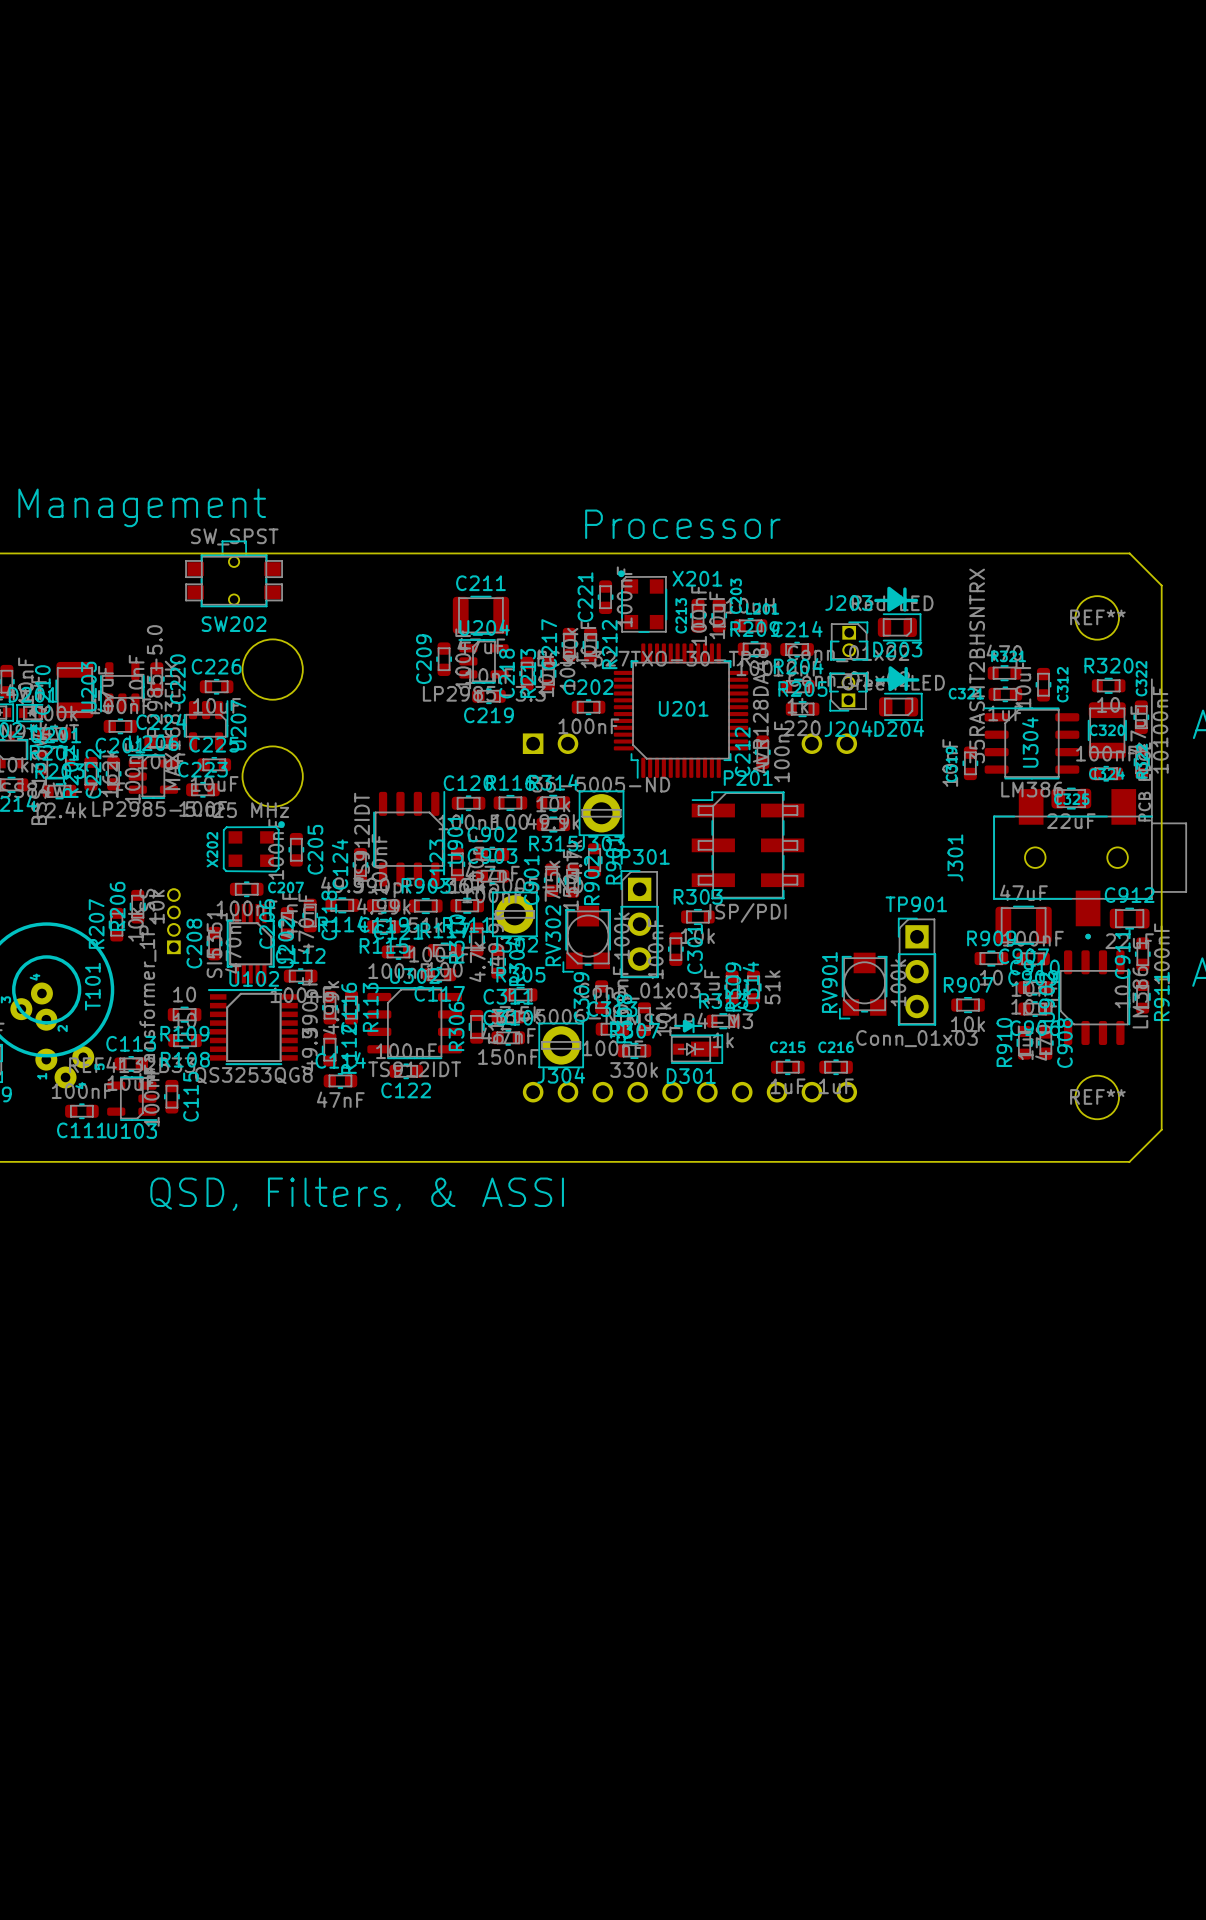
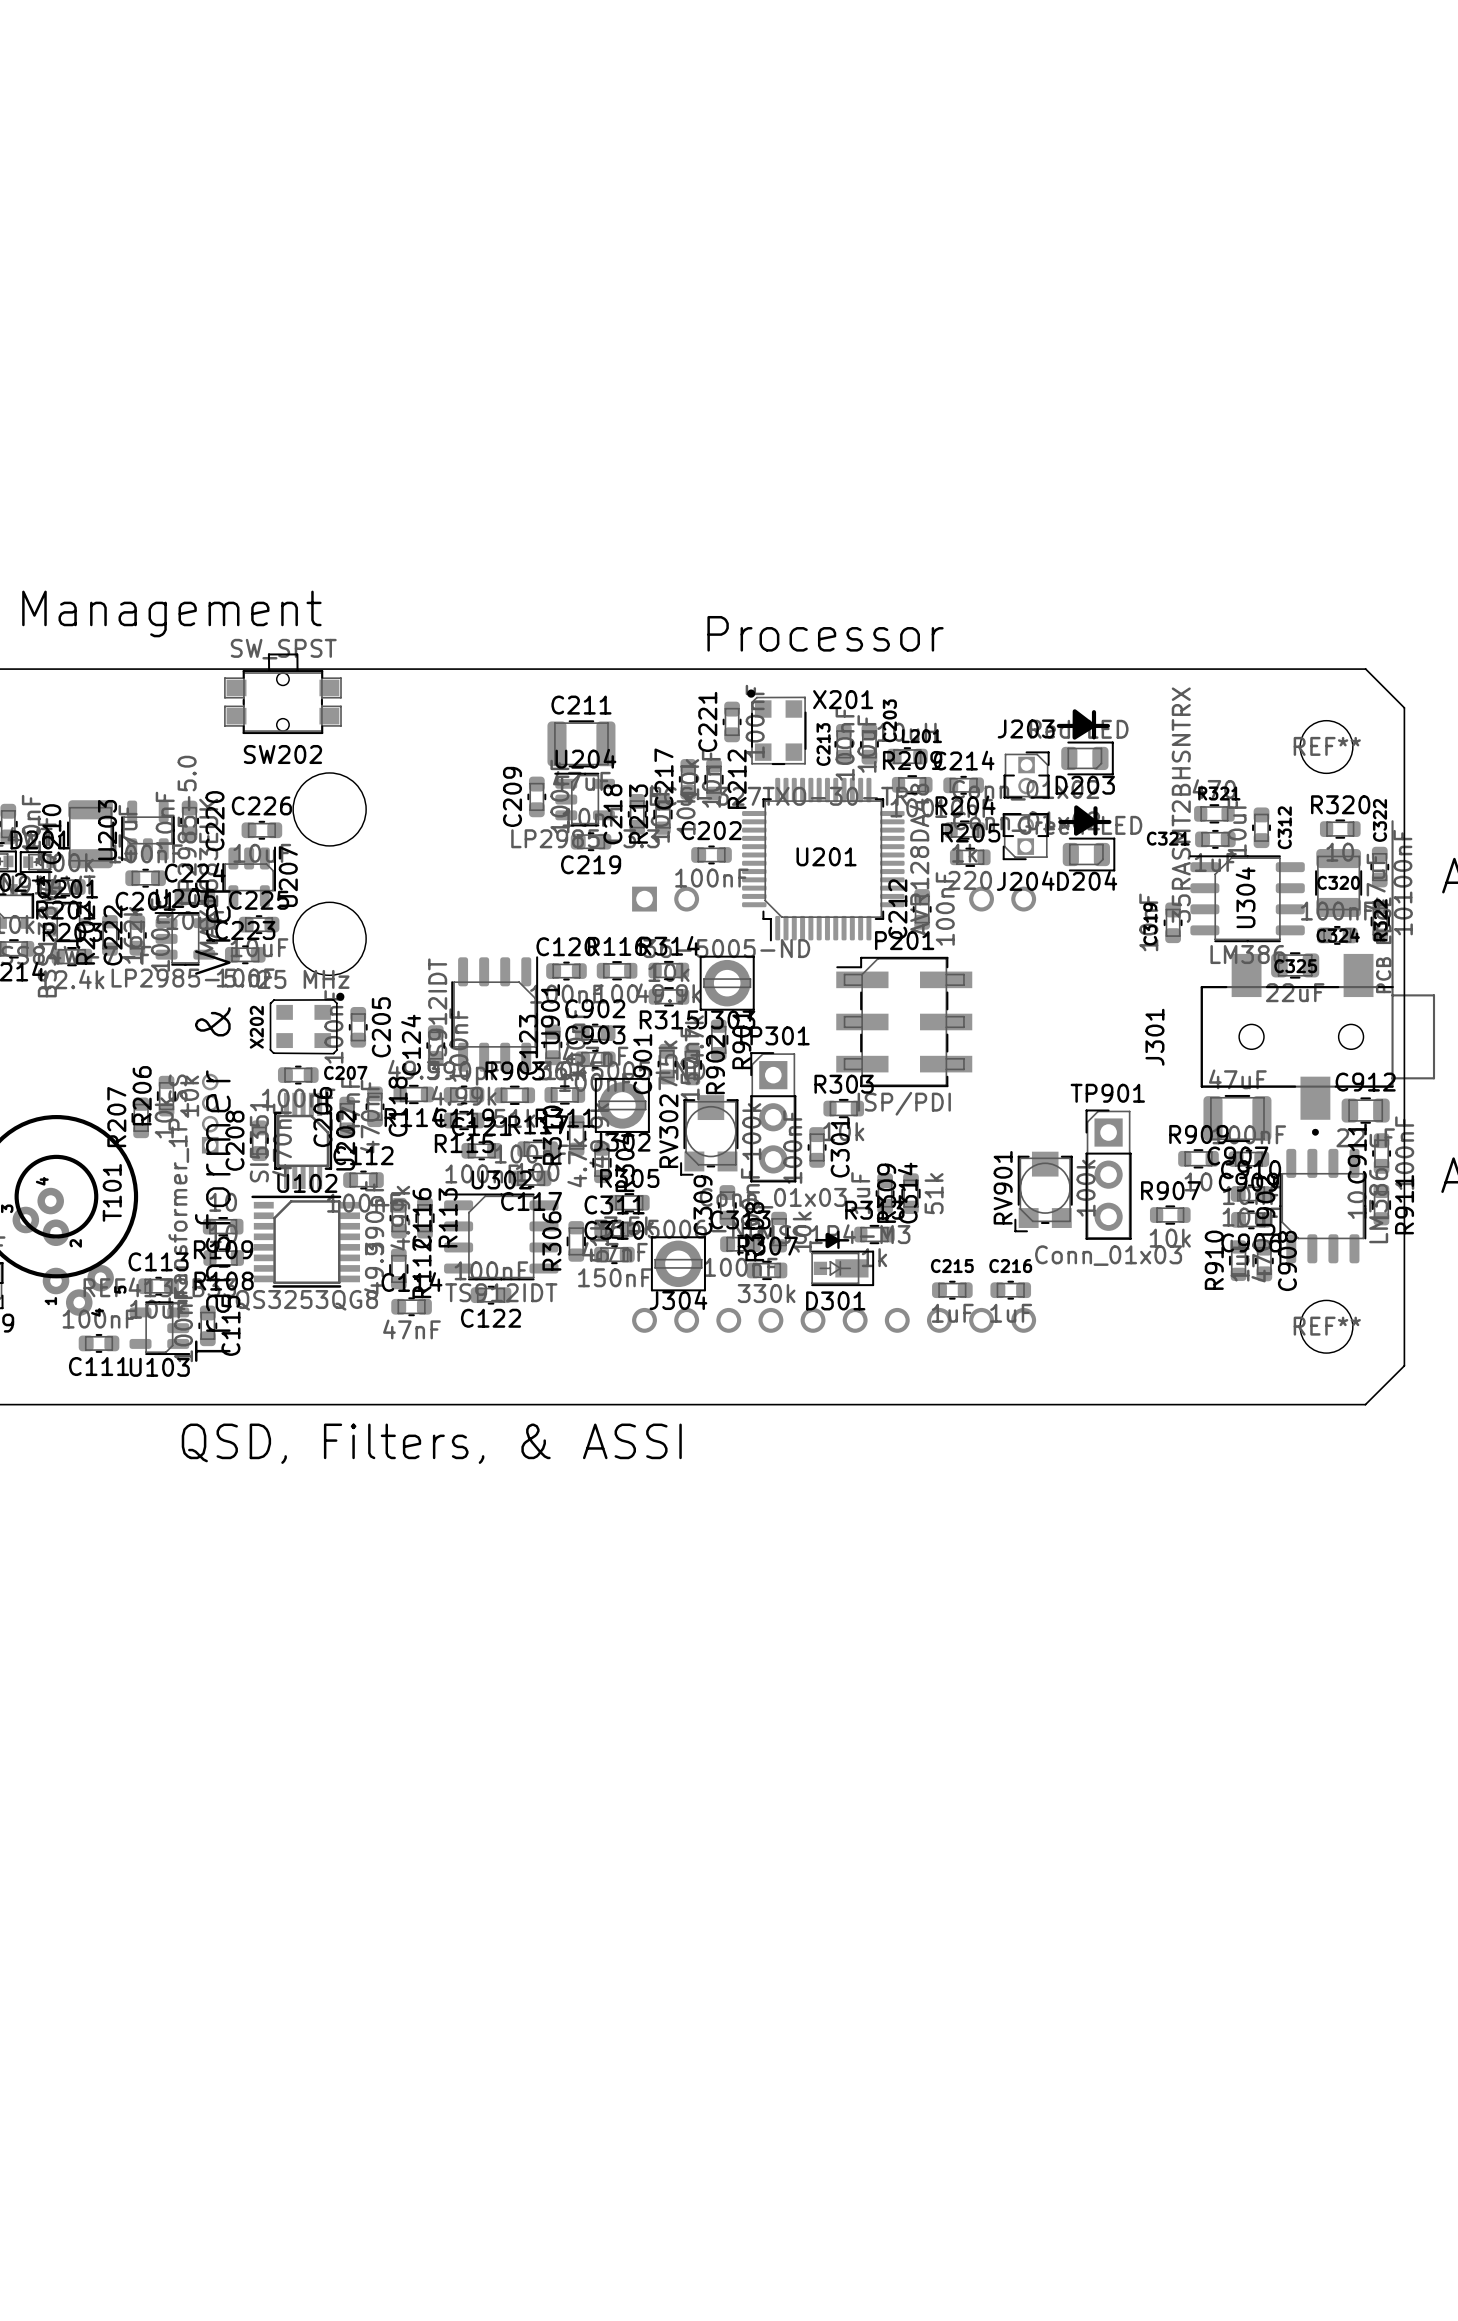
text: none -> Transformer & Vref (212, 1122)

